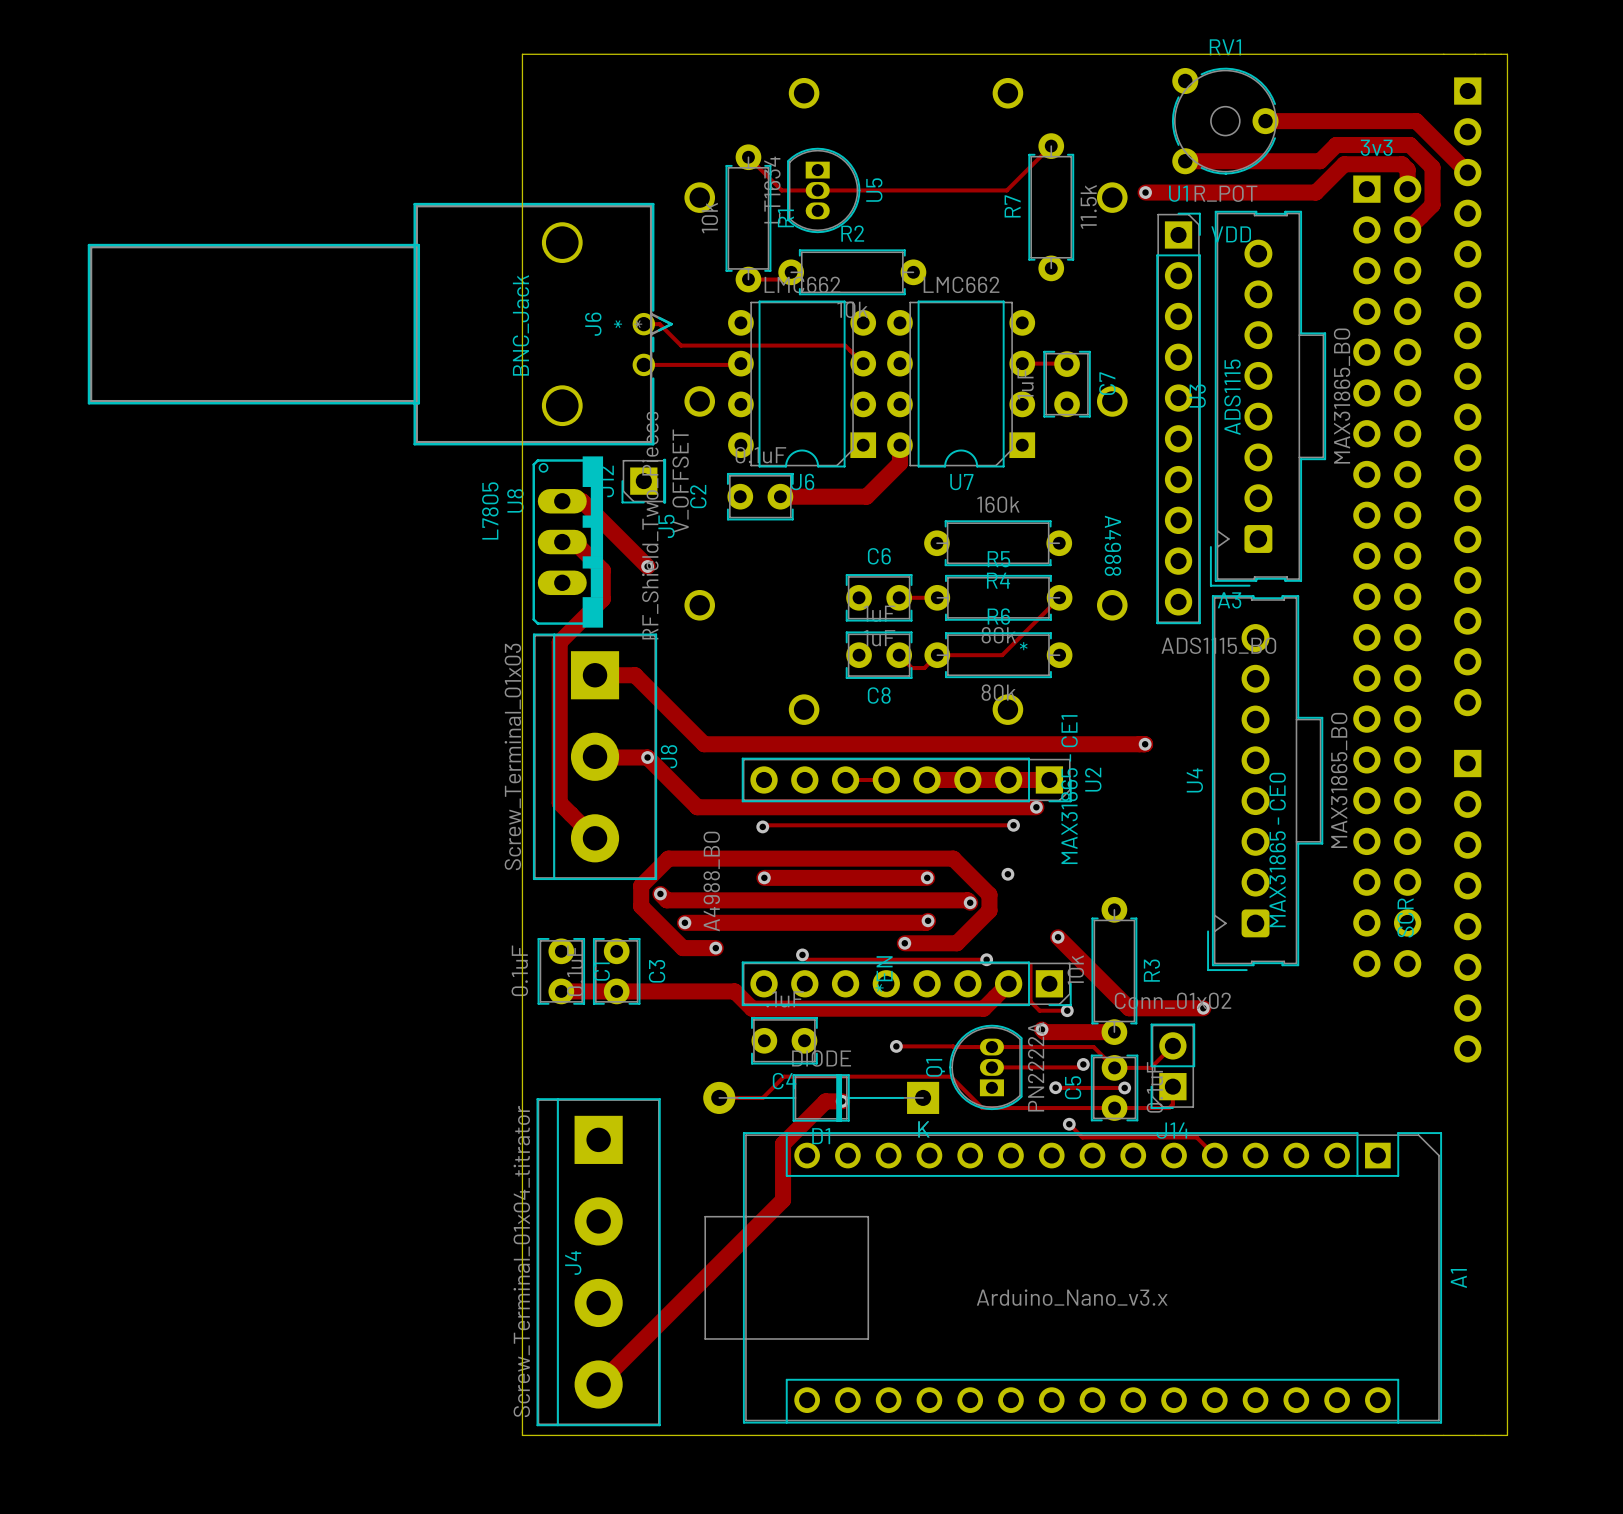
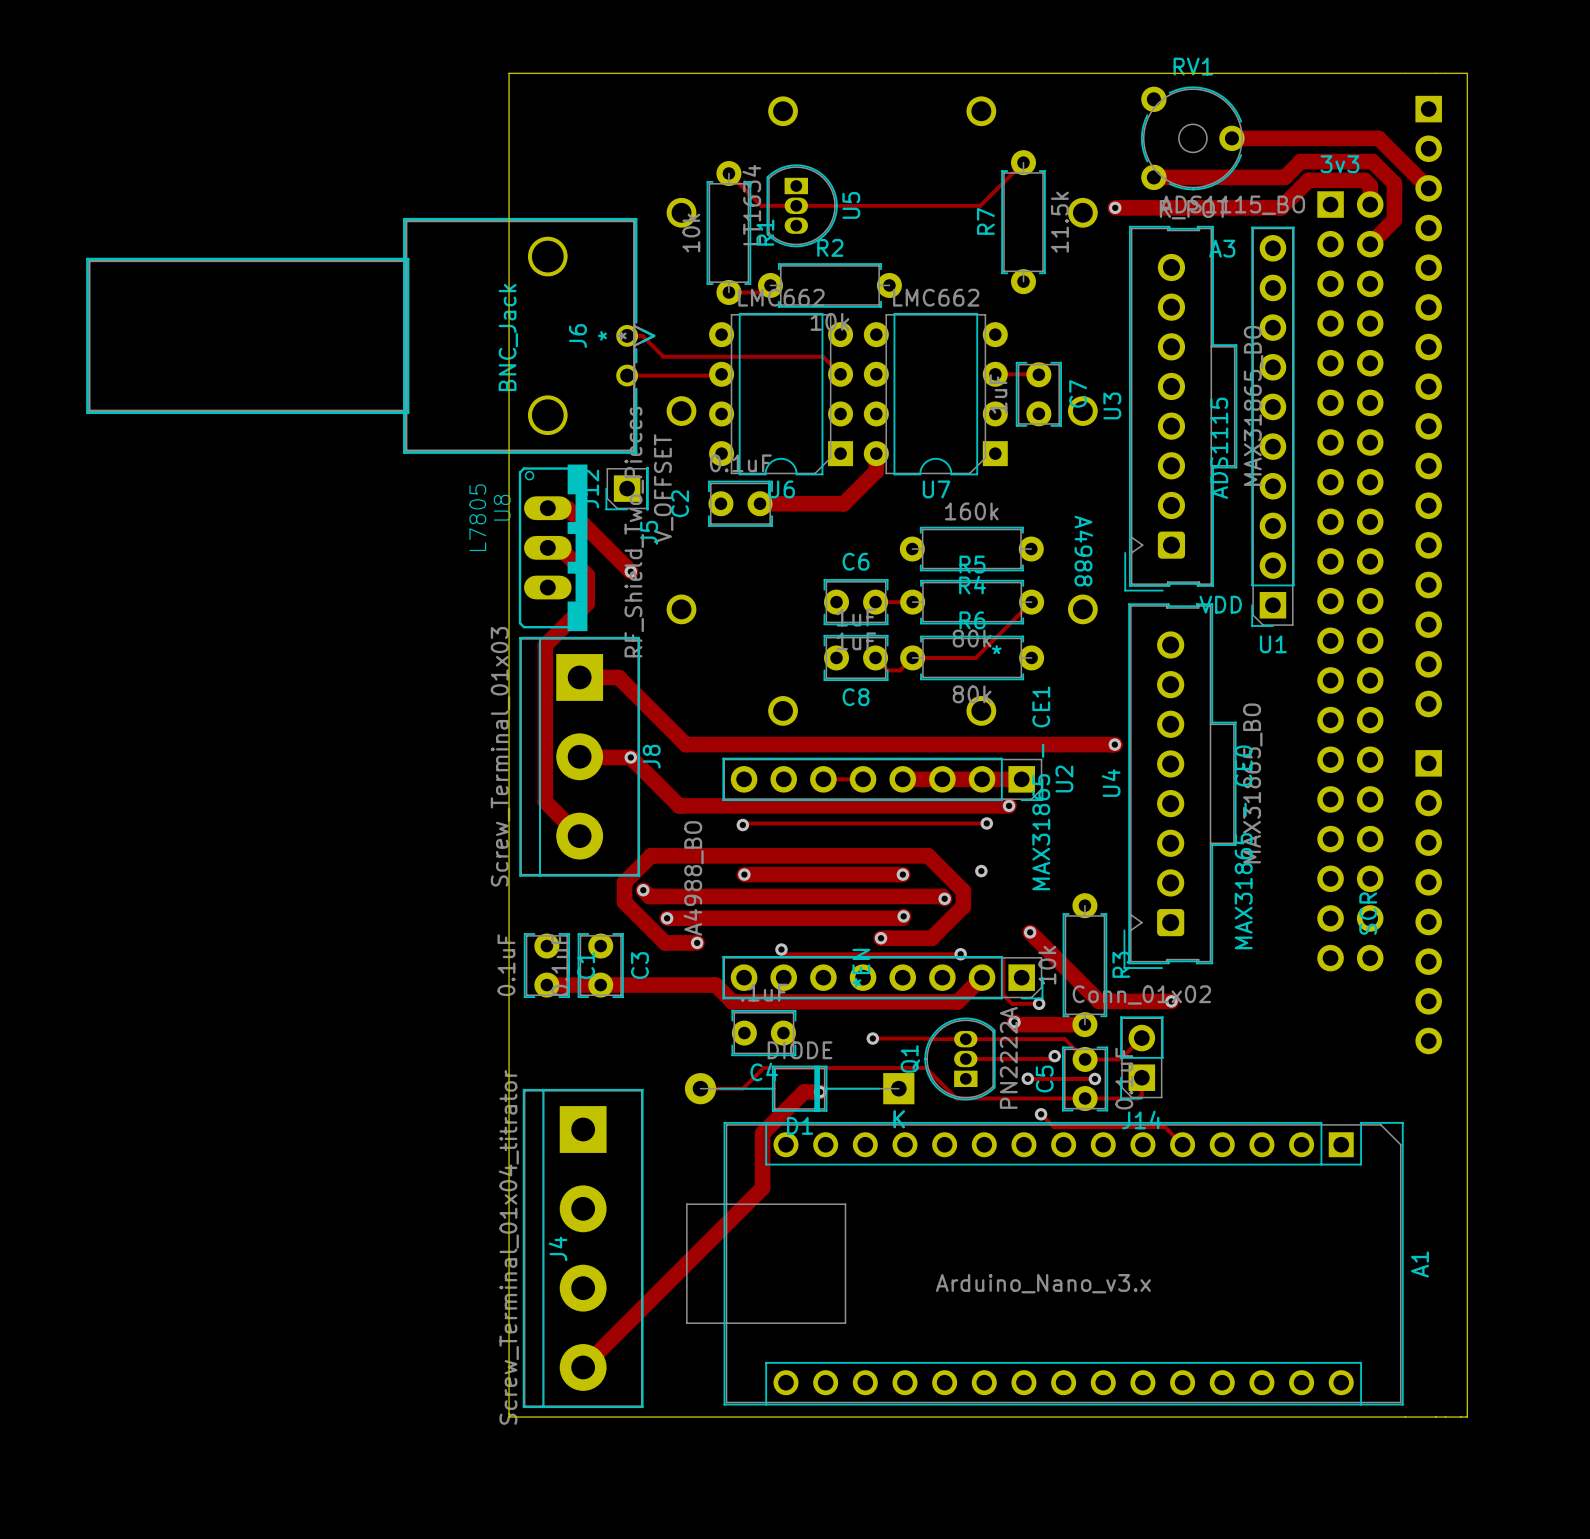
U3 position: (1268, 398) -> (1180, 408)
U1 rotation: 0° (1178, 418) -> 180° (1272, 426)
U4 position: (1265, 783) -> (1180, 786)

